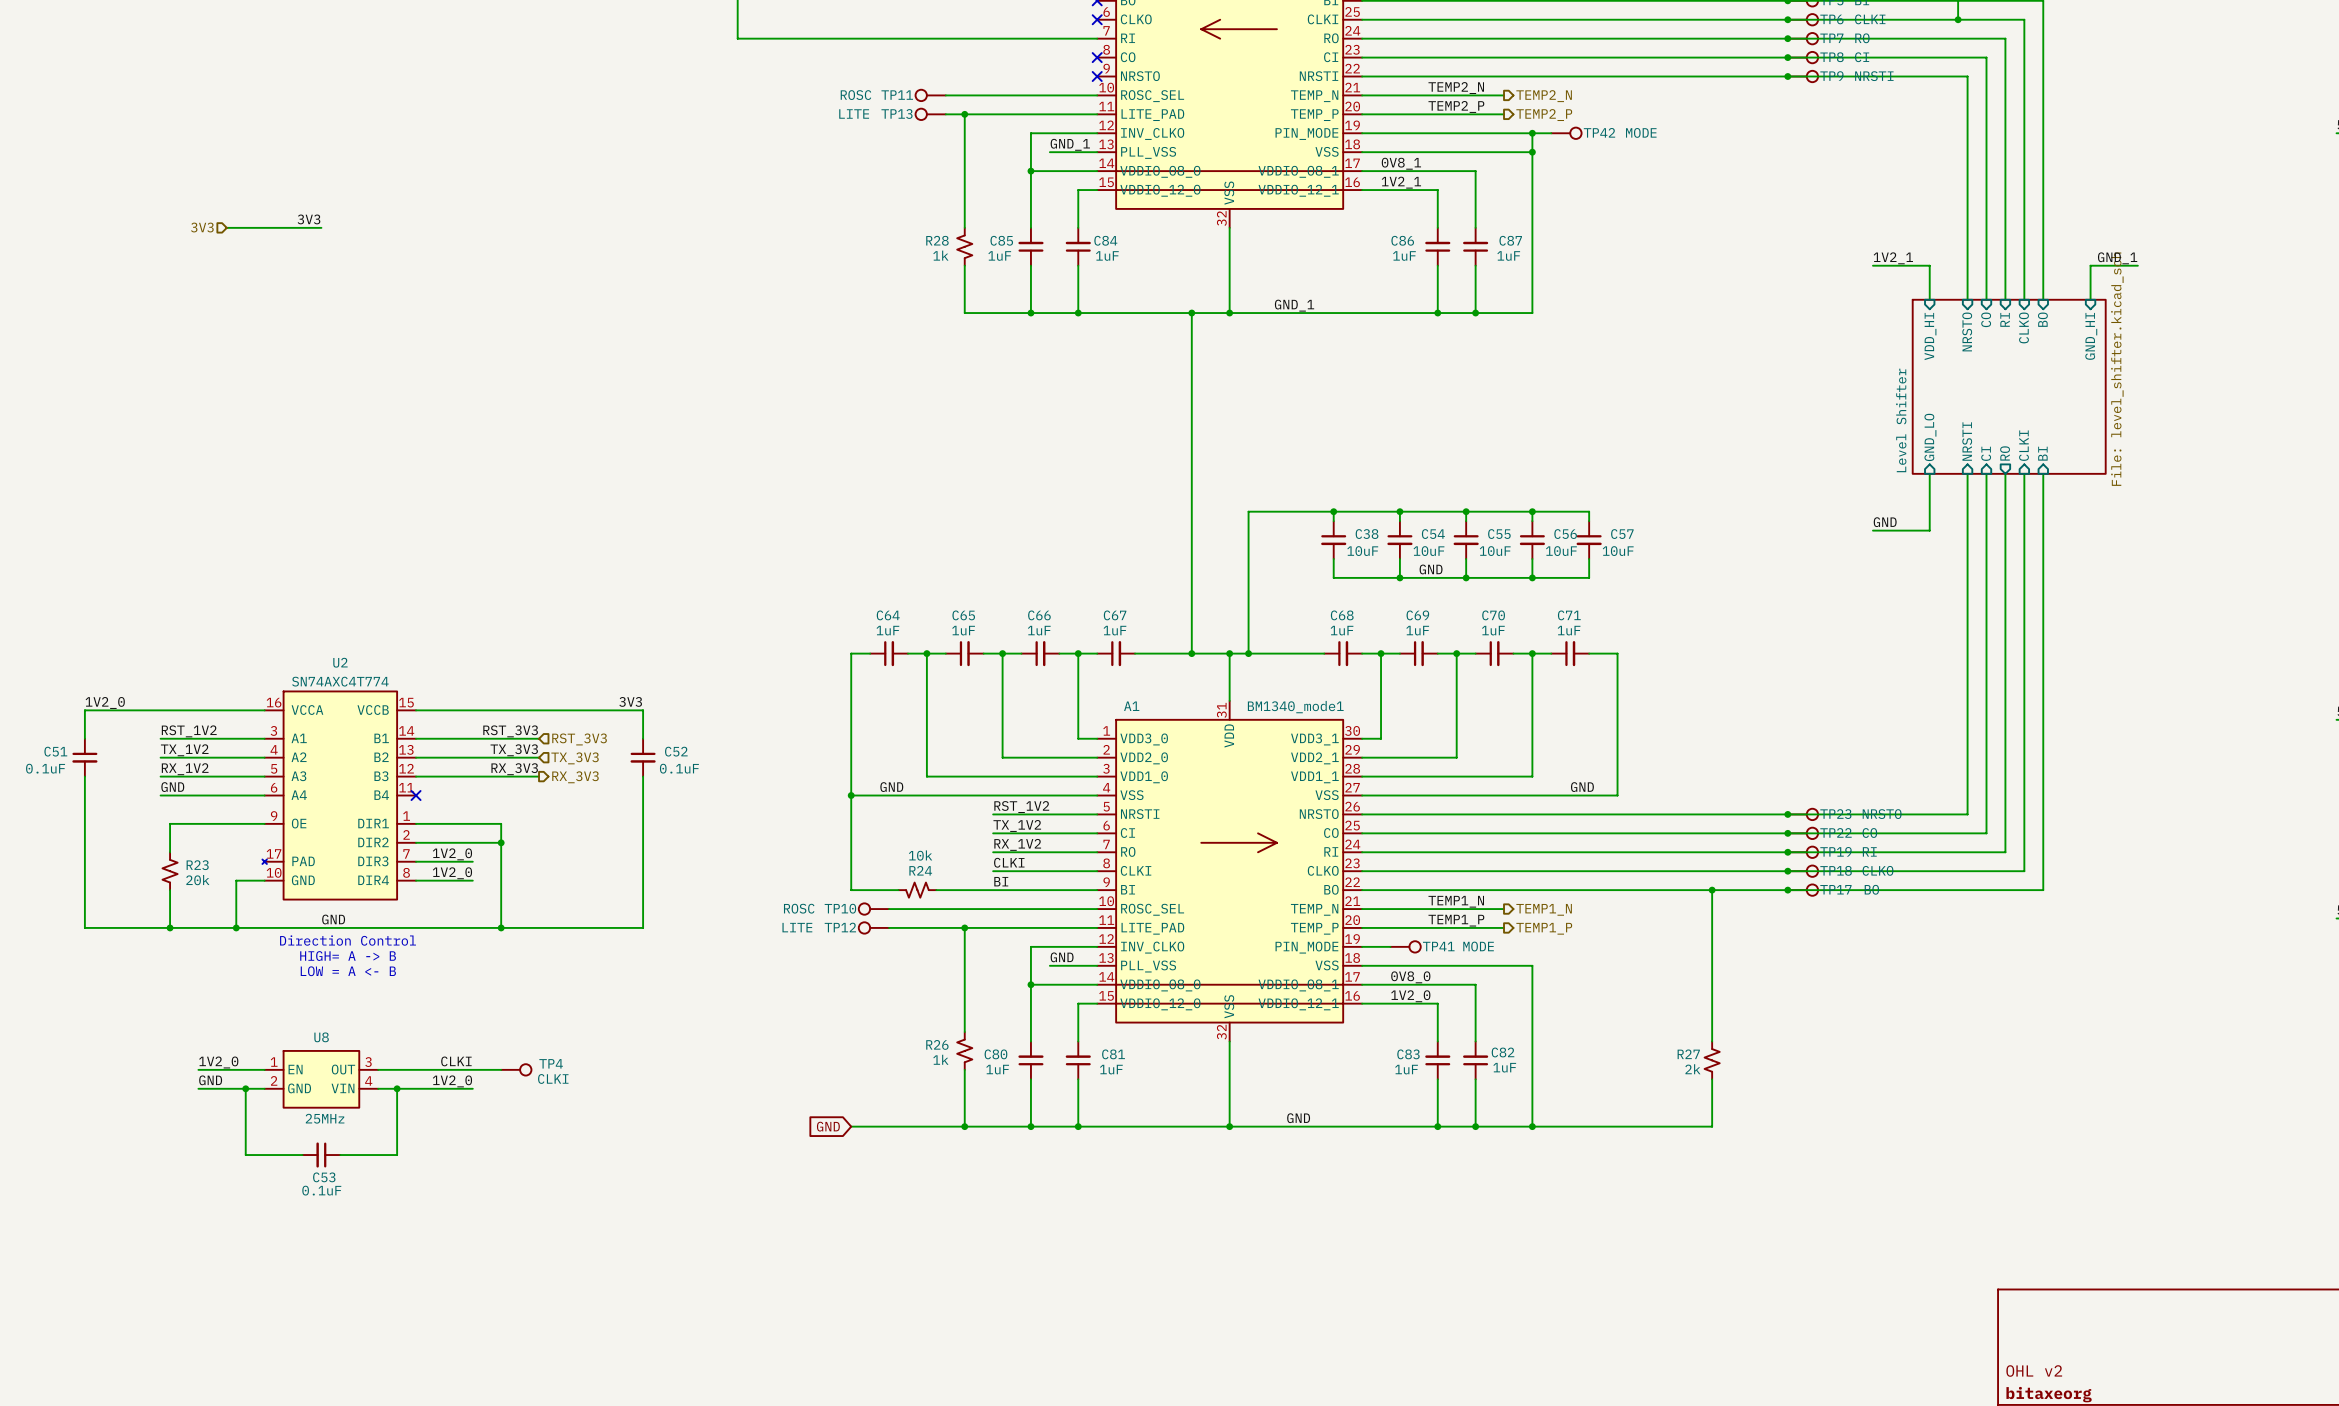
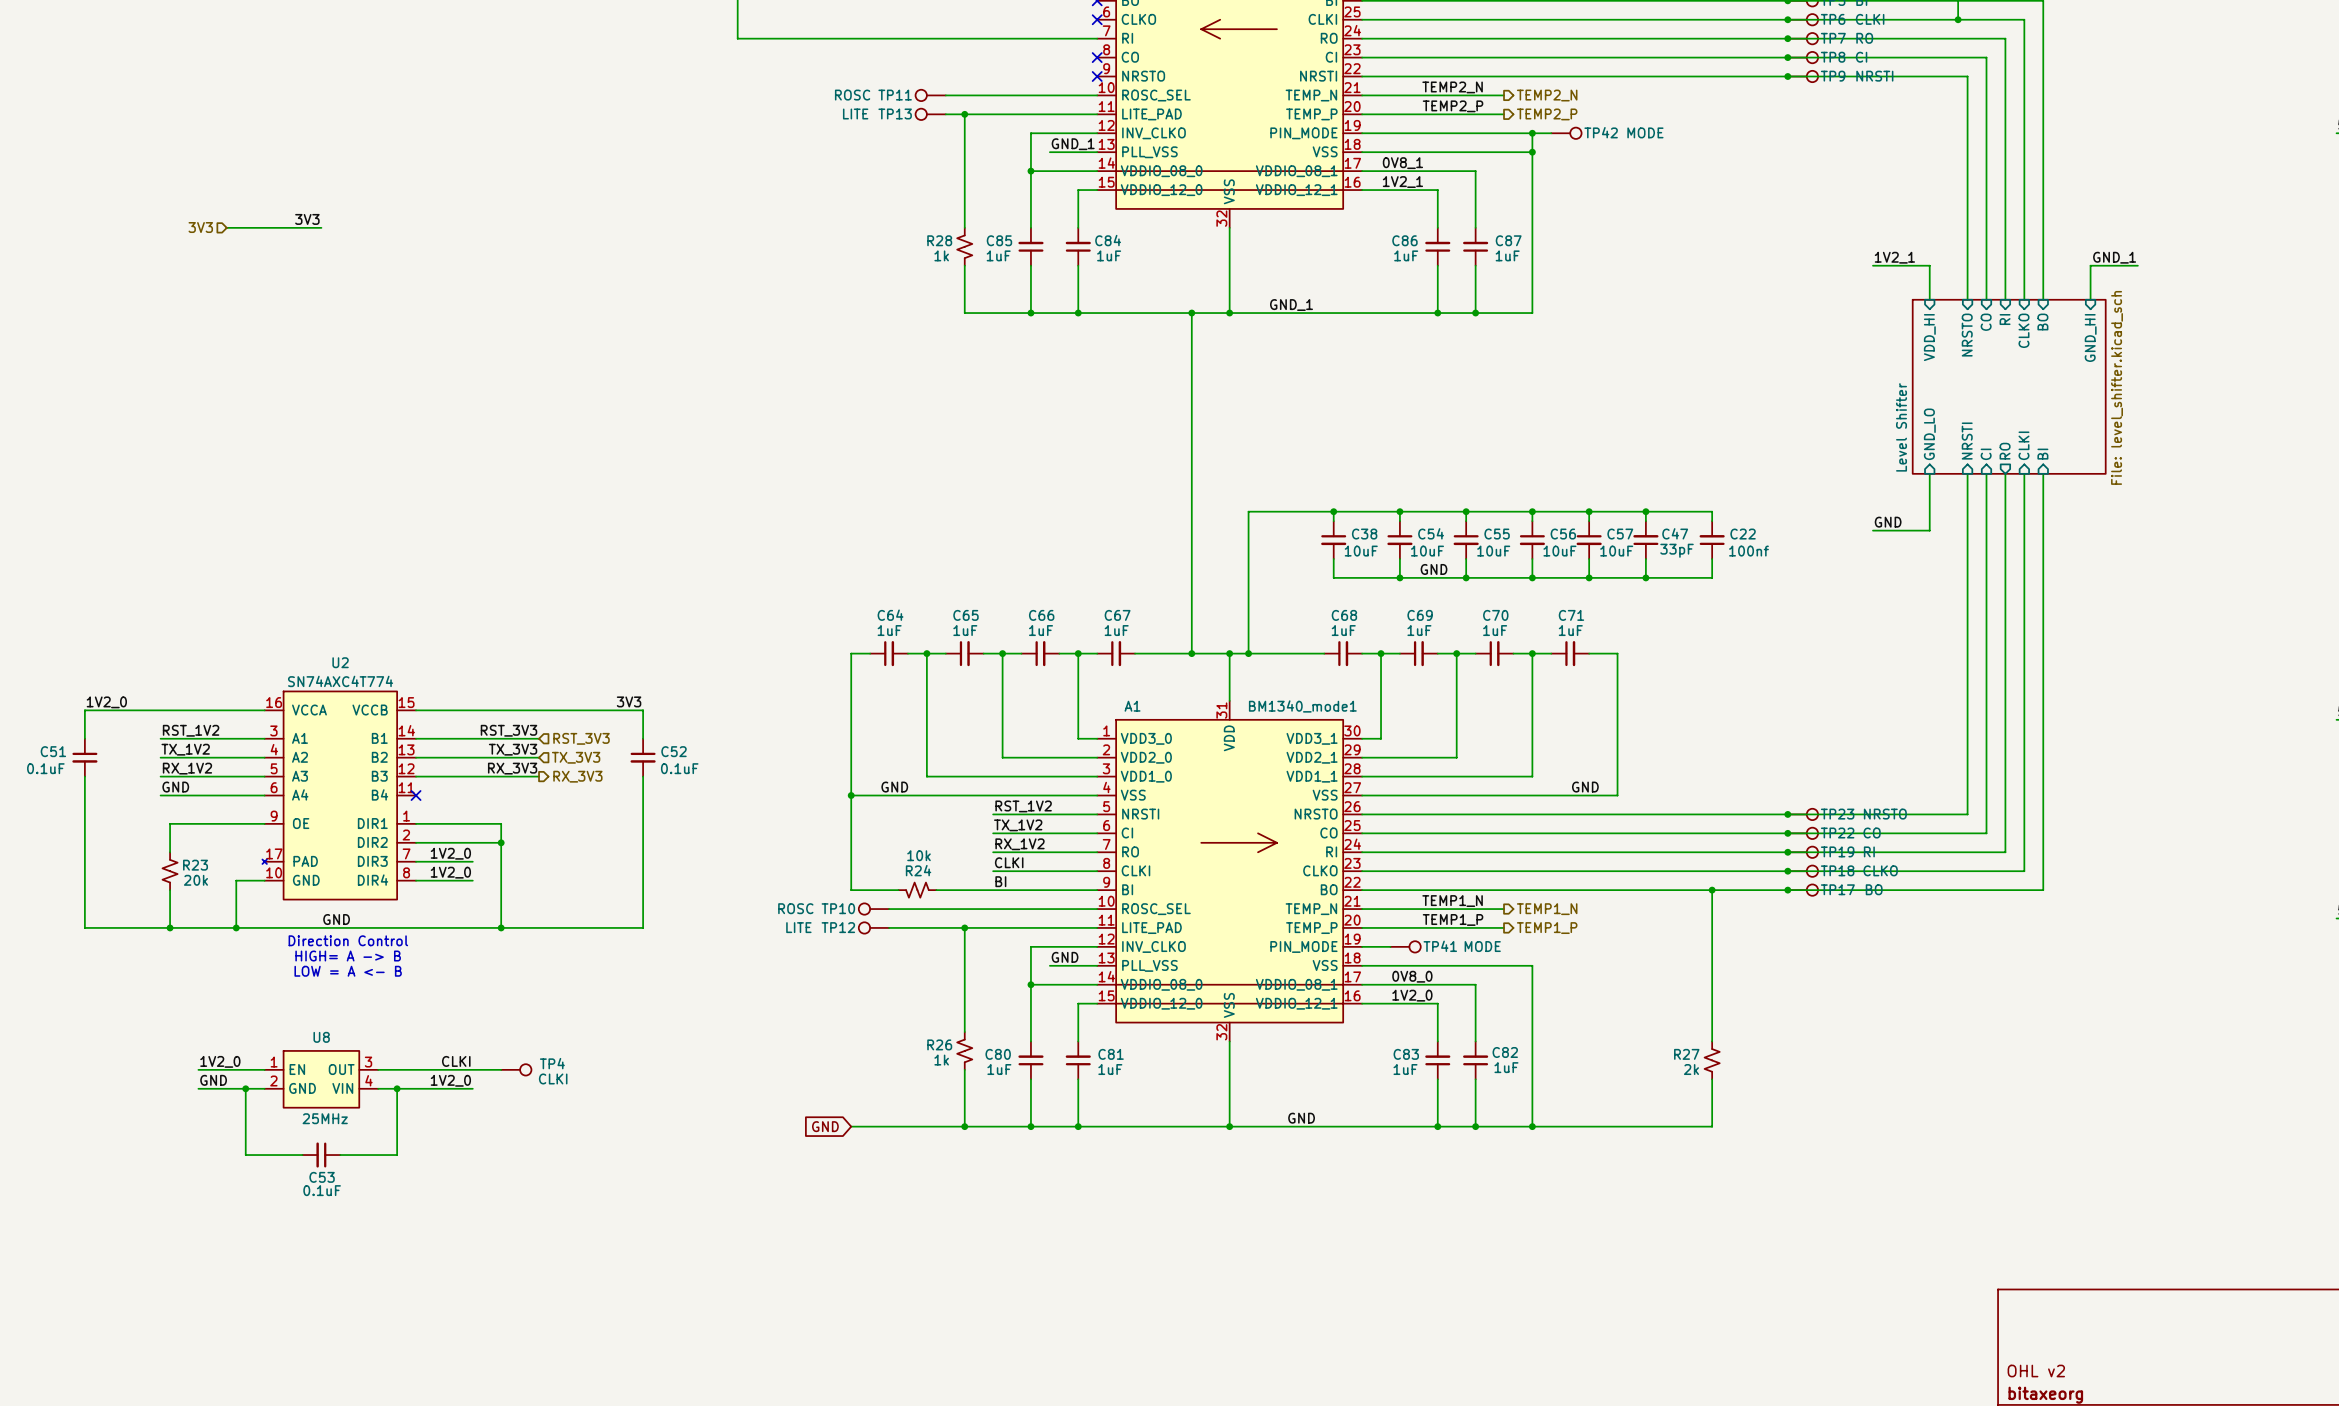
wire: none -> (1589, 511) (1712, 511) (1712, 521)
junction: none -> (1589, 511)
wire: none -> (1645, 511) (1645, 521)
junction: none -> (1645, 511)
C47: none -> 33pF (1645, 540)
C22: none -> 100nf (1712, 540)
wire: none -> (1645, 558) (1645, 577)
wire: none -> (1712, 558) (1712, 577) (1589, 577)
junction: none -> (1589, 577)
junction: none -> (1645, 577)

